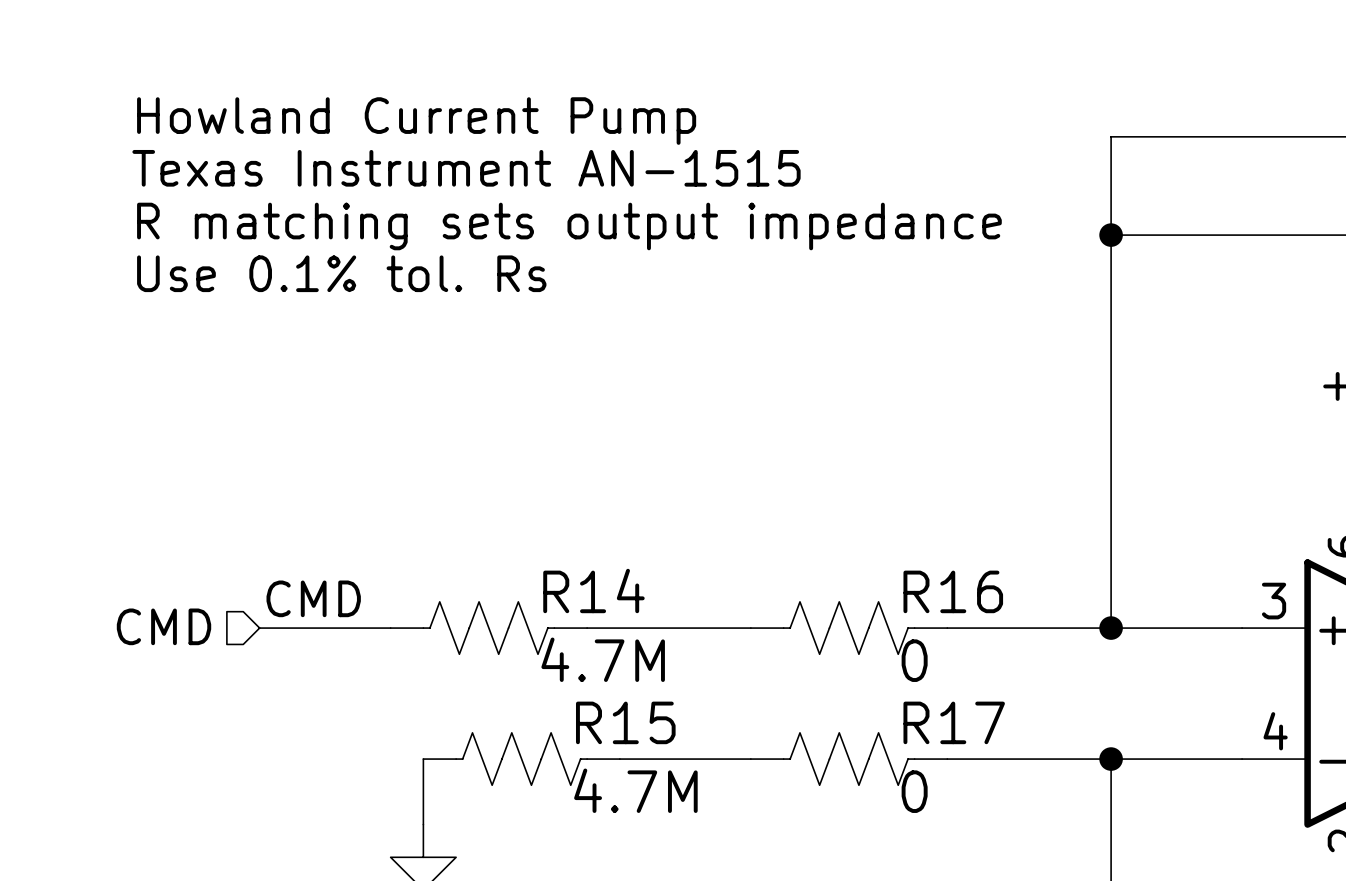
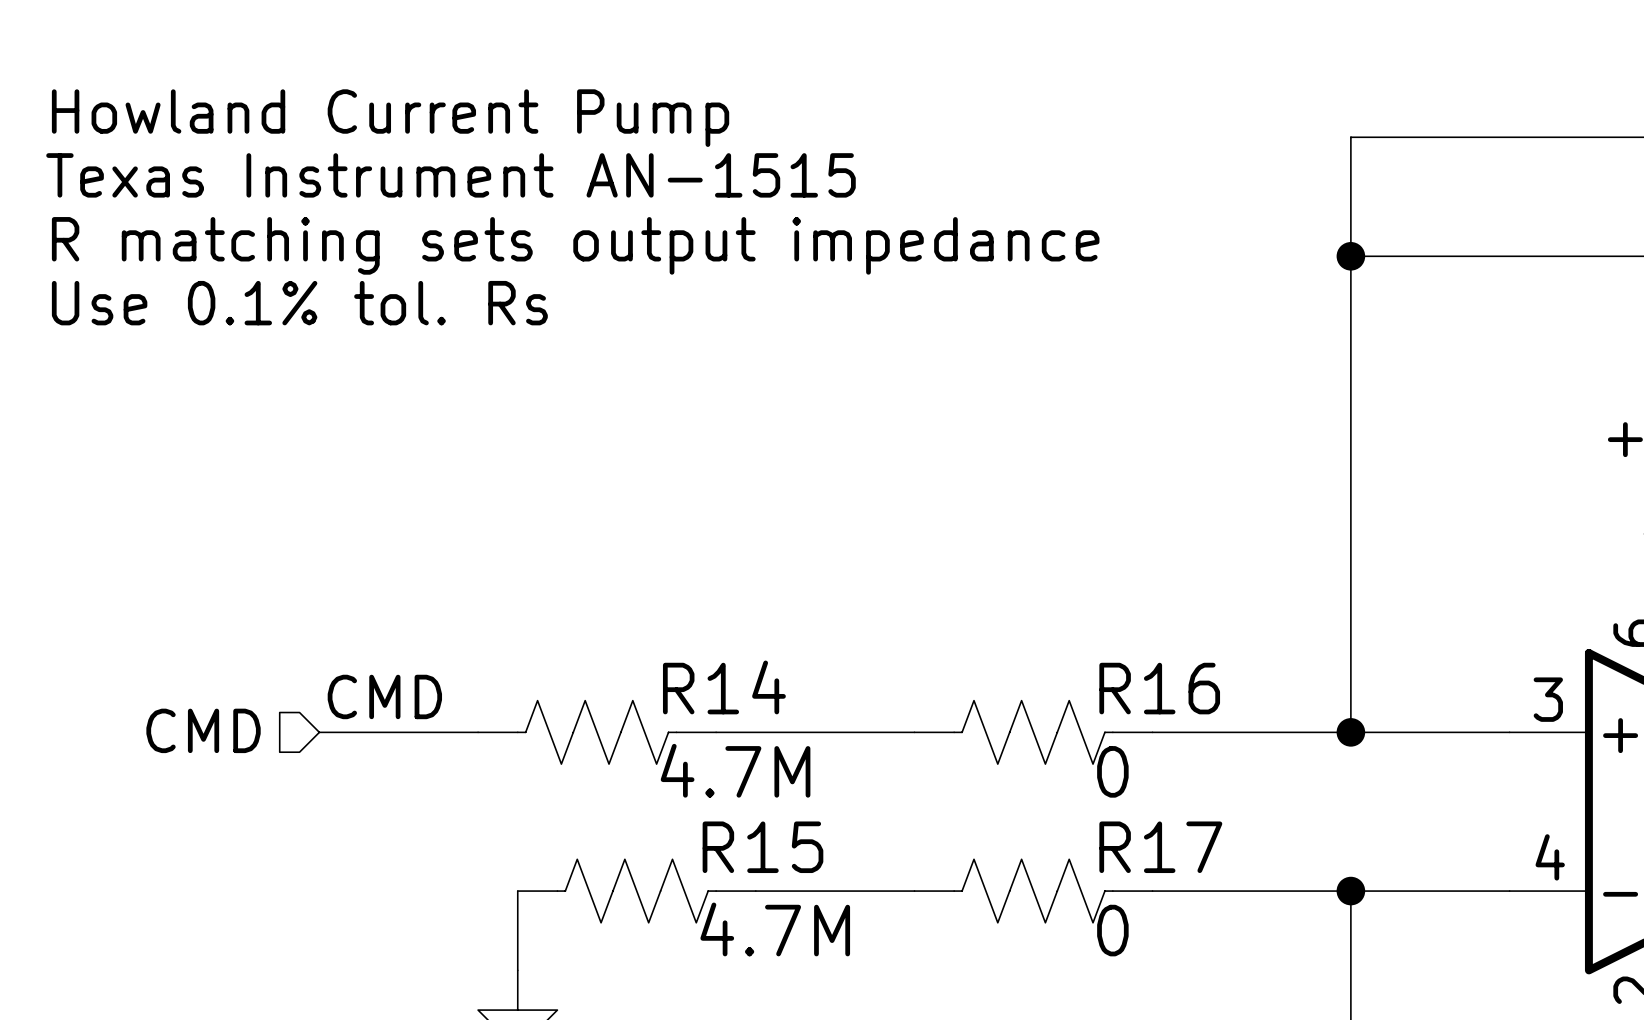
text position: Howland Current Pump (416, 121) -> Howland Current Pump (390, 118)
text position: Texas Instrument AN-1515 (466, 168) -> Texas Instrument AN-1515 (450, 175)
text position: R matching sets output impedance (569, 226) -> R matching sets output impedance (575, 245)
text position: Use 0.1% tol. Rs (341, 273) -> Use 0.1% tol. Rs (299, 303)

